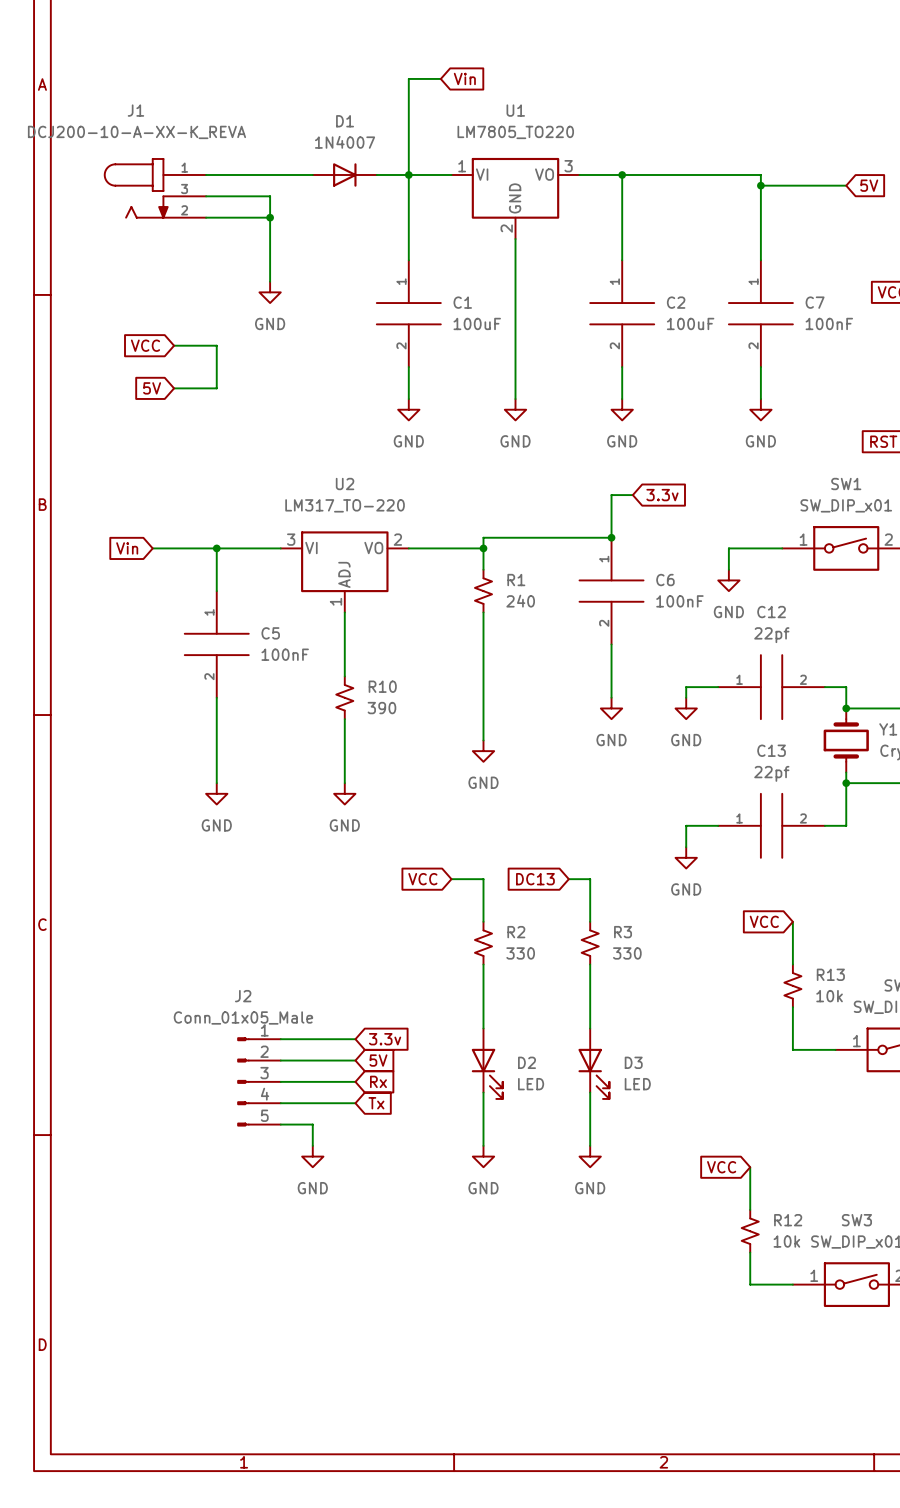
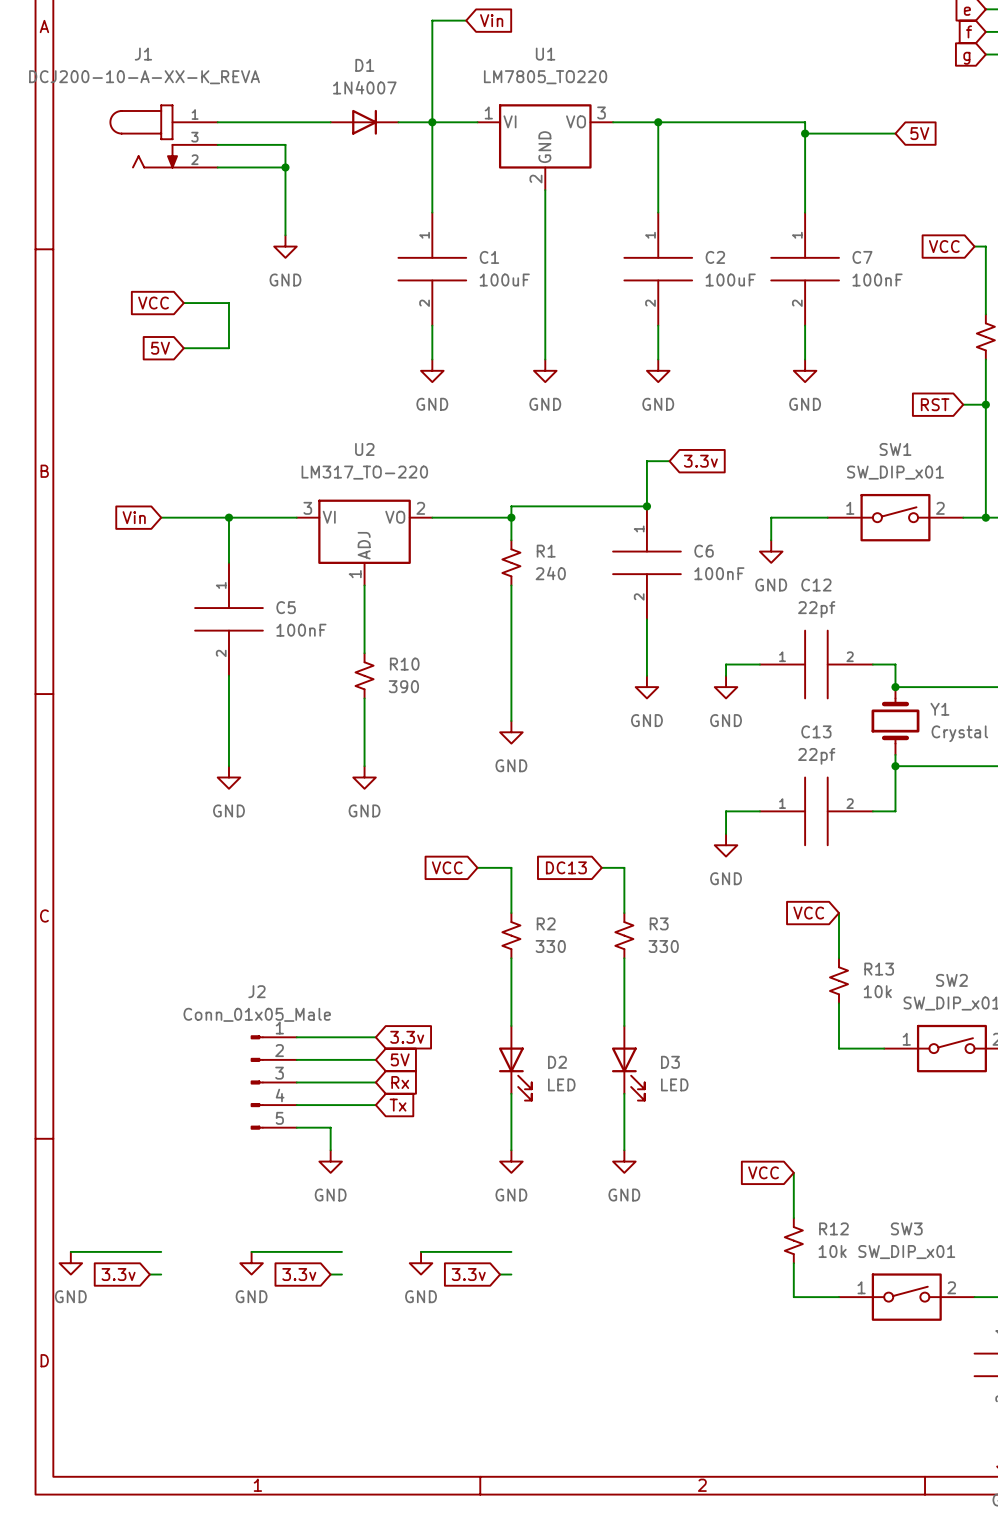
wire: none -> (70, 1251) (161, 1251)
wire: none -> (251, 1251) (341, 1251)
wire: none -> (421, 1251) (511, 1251)
power symbol: none -> GND (70, 1263)
power symbol: none -> GND (251, 1263)
power symbol: none -> GND (421, 1263)
global label: none -> 3.3v (118, 1274)
wire: none -> (149, 1274) (161, 1274)
global label: none -> 3.3v (299, 1274)
wire: none -> (330, 1274) (341, 1274)
global label: none -> 3.3v (468, 1274)
wire: none -> (500, 1274) (511, 1274)

